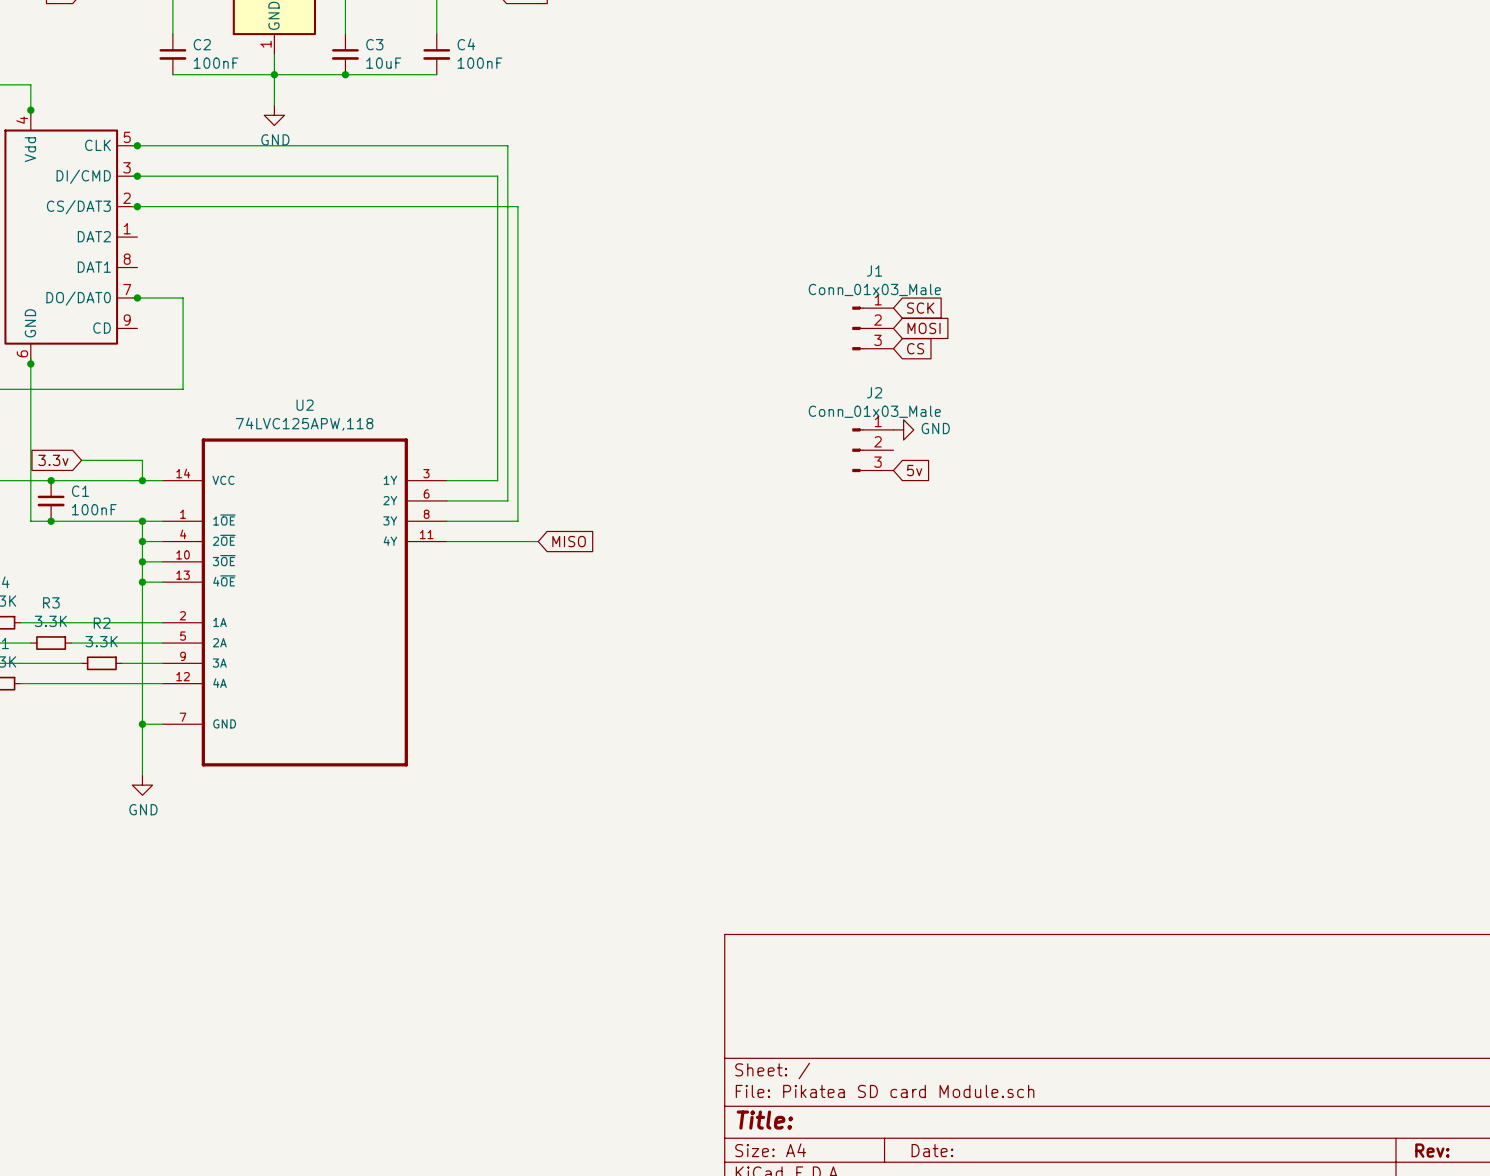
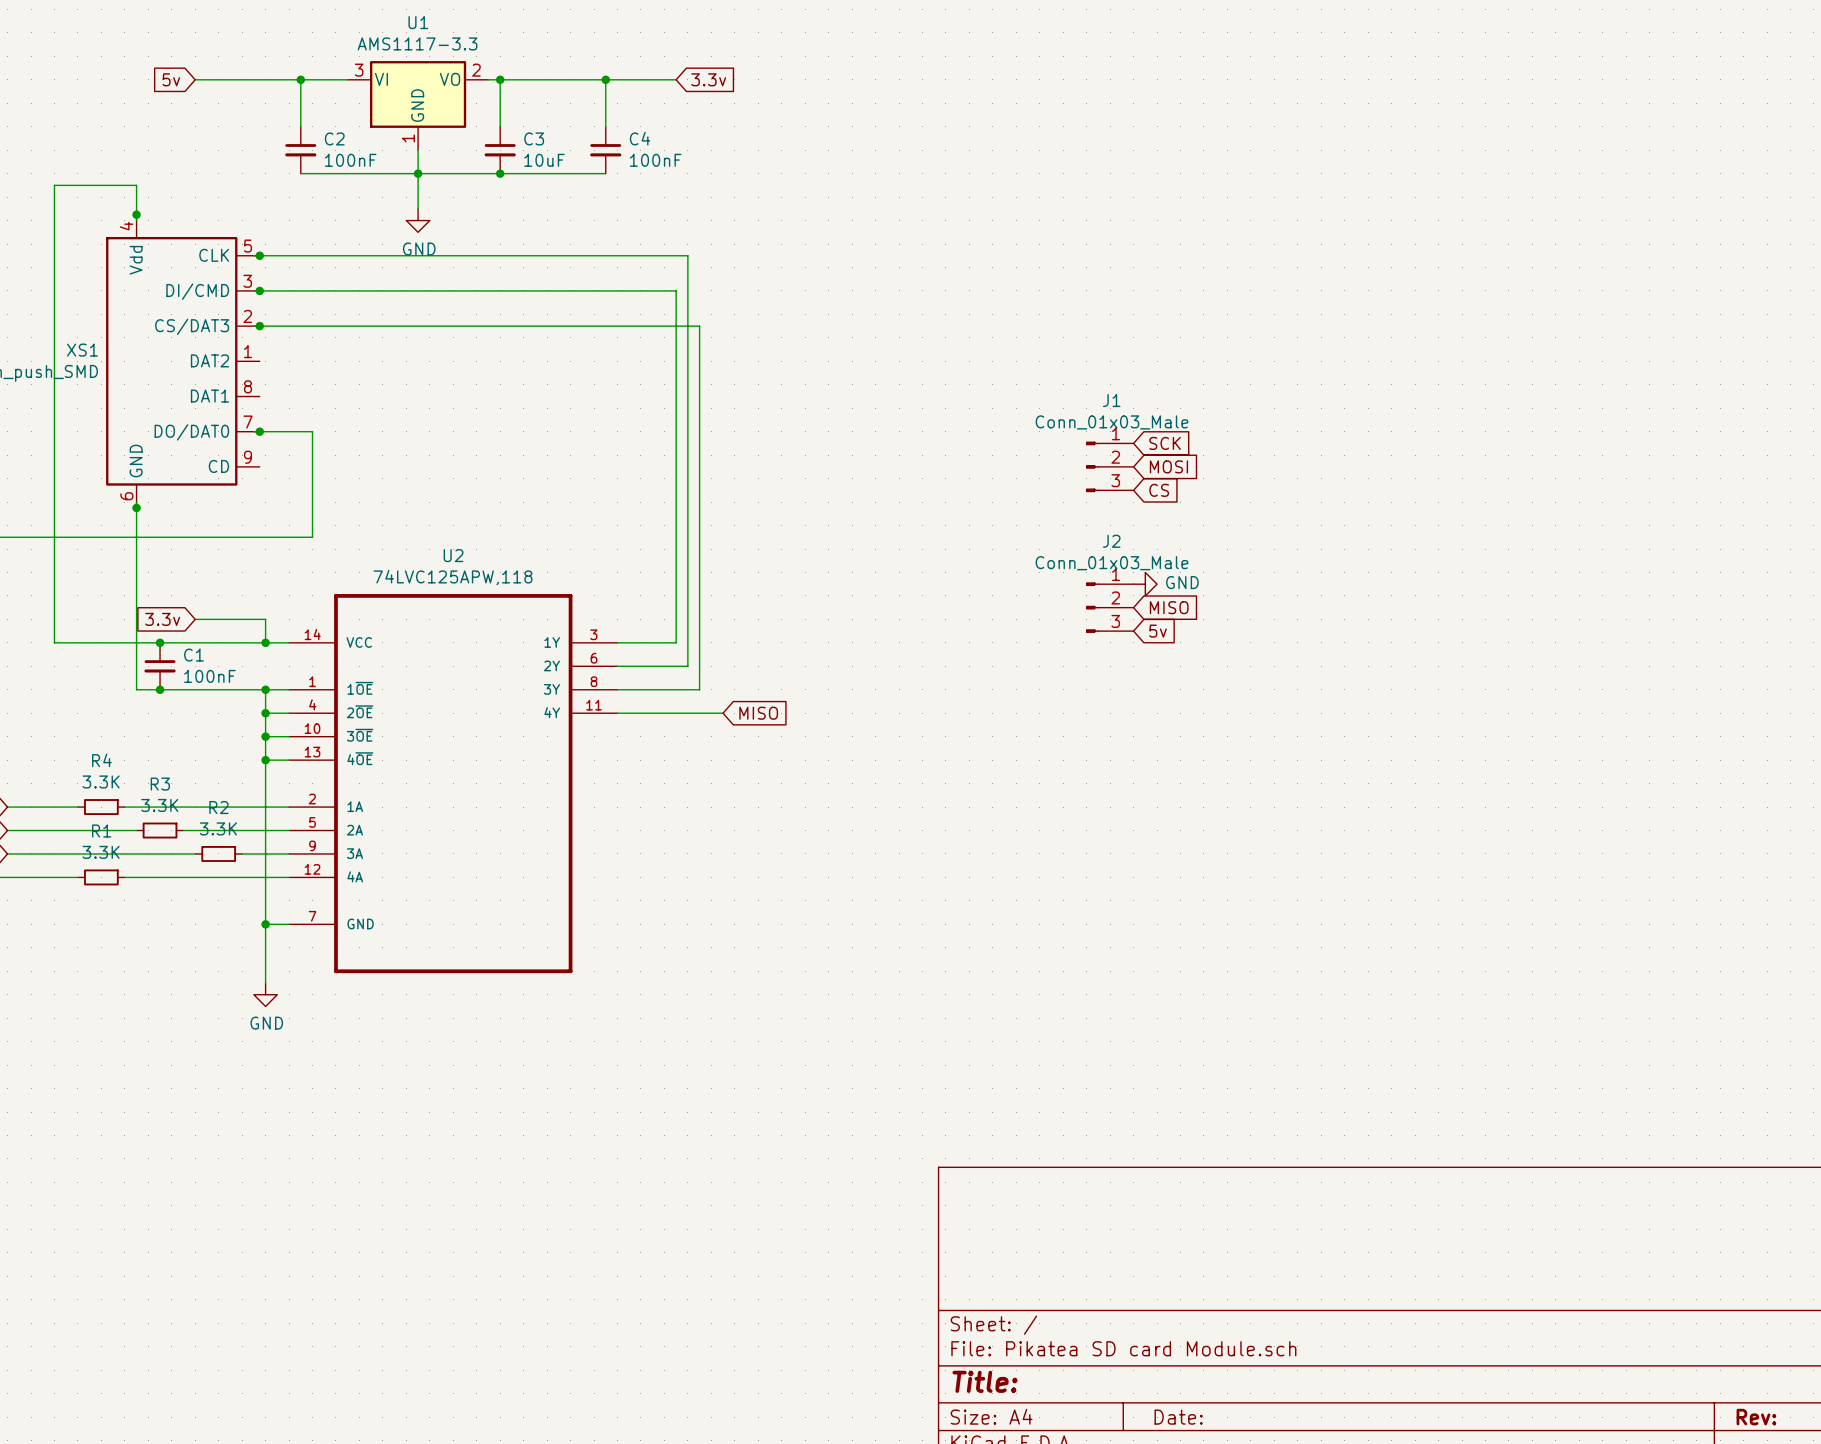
global label: none -> MISO (1169, 607)

